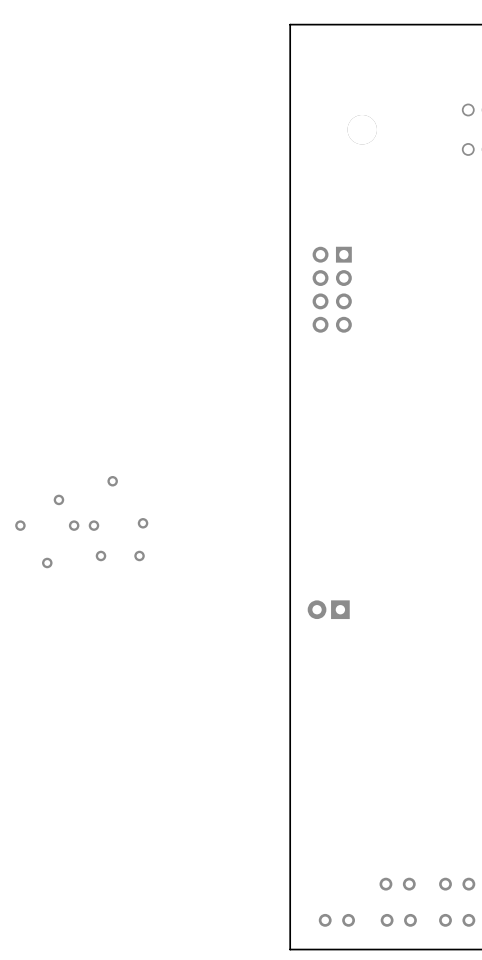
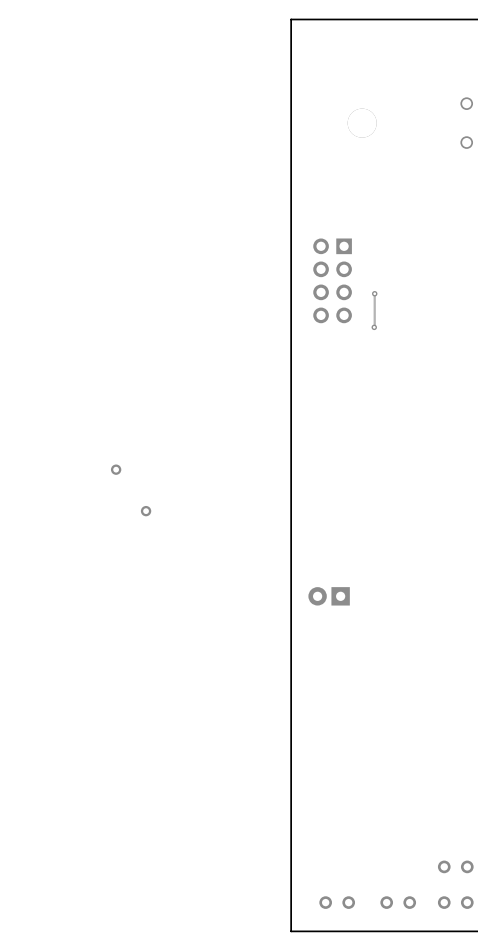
track: none -> (374, 293) (374, 327)
via: none -> (374, 293)
via: none -> (374, 327)
part: (58, 499) -> none
part: (20, 525) -> none
part: (74, 525) -> none
part: (93, 525) -> none
part: (100, 555) -> none
part: (139, 555) -> none
part: (47, 562) -> none
part: (397, 884) -> none

